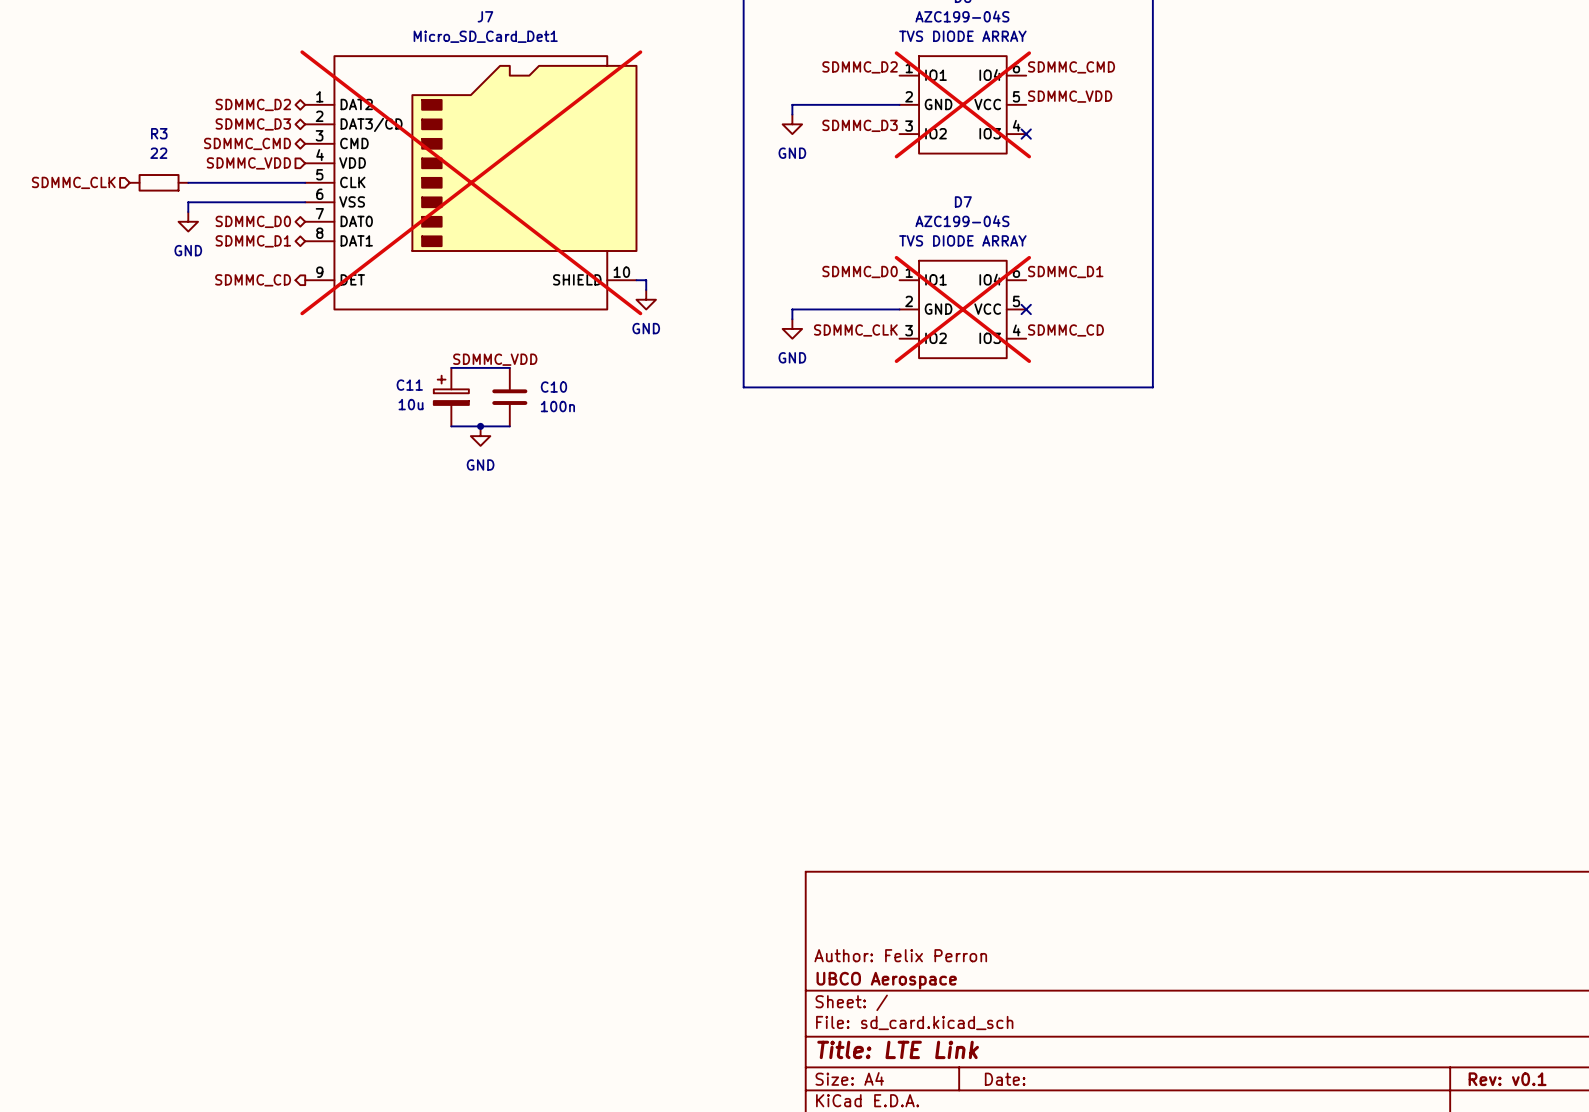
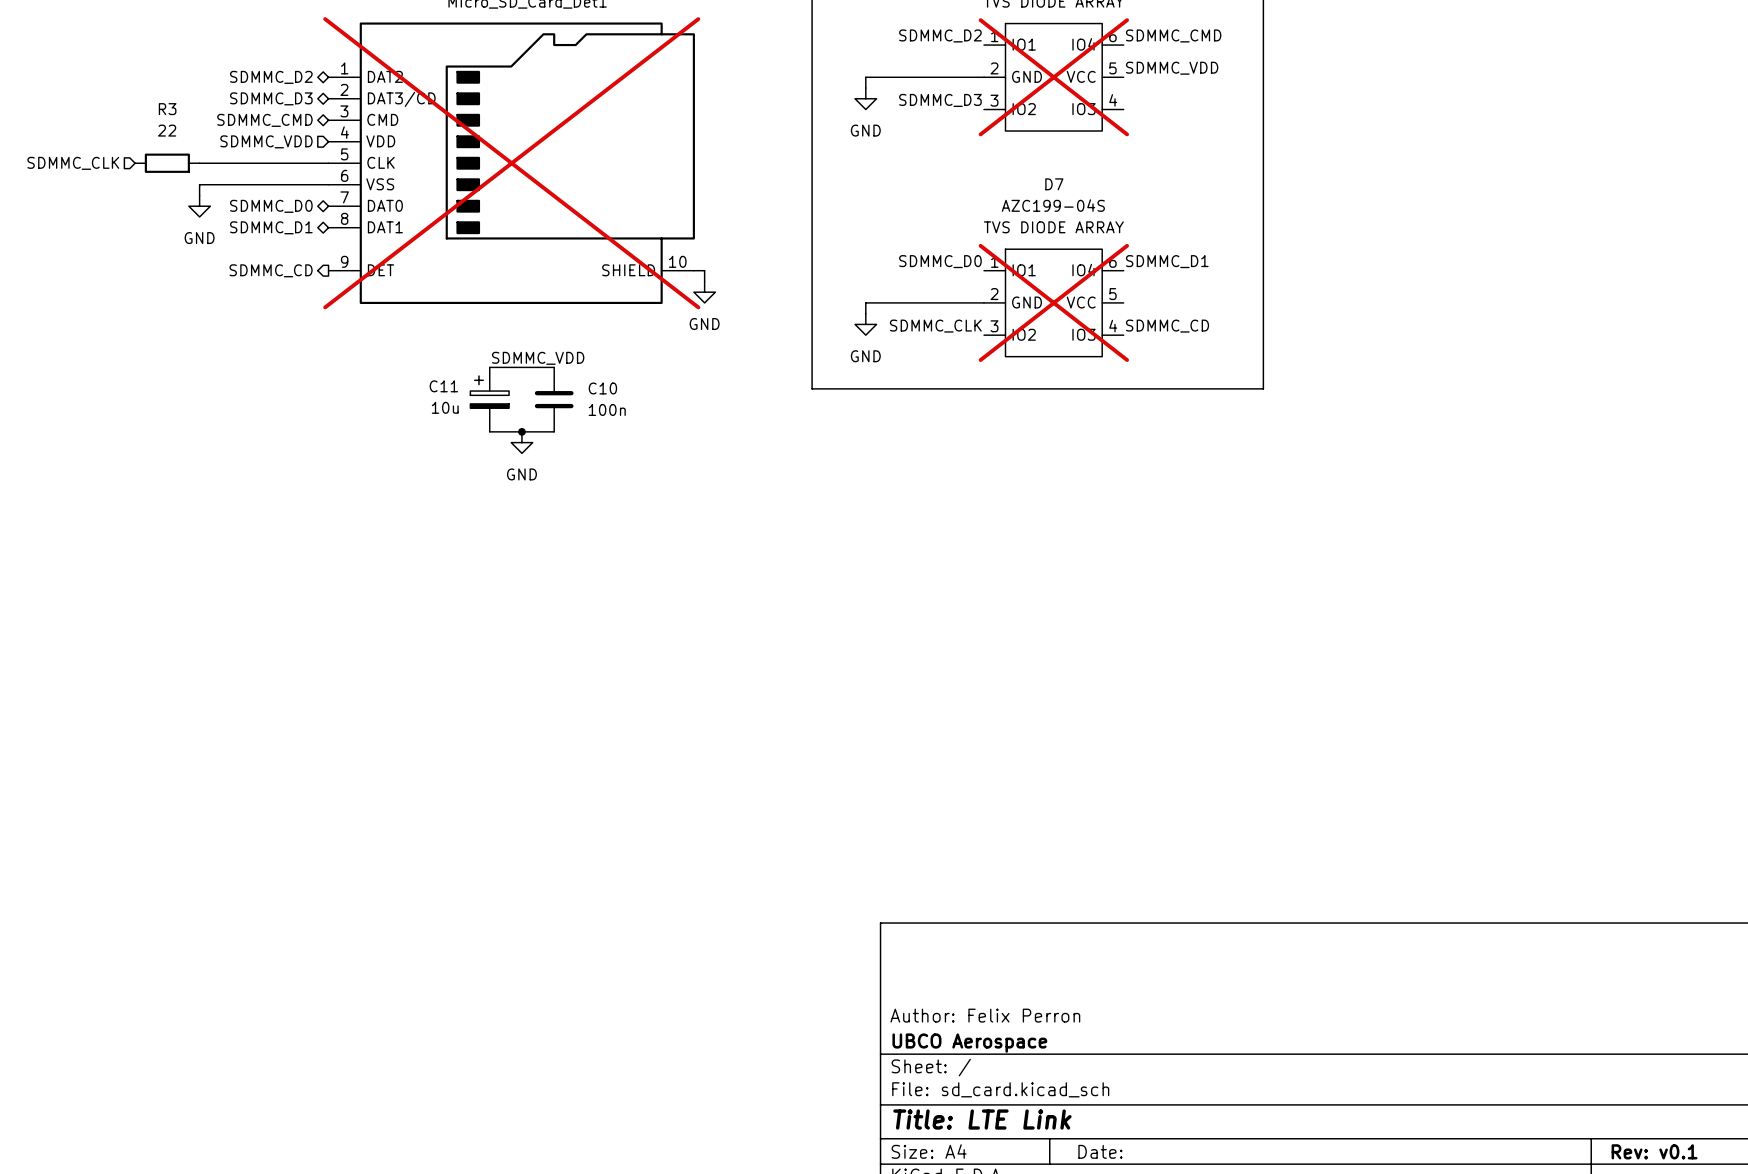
no-connect mark: (1026, 134) -> none
no-connect mark: (1026, 309) -> none

